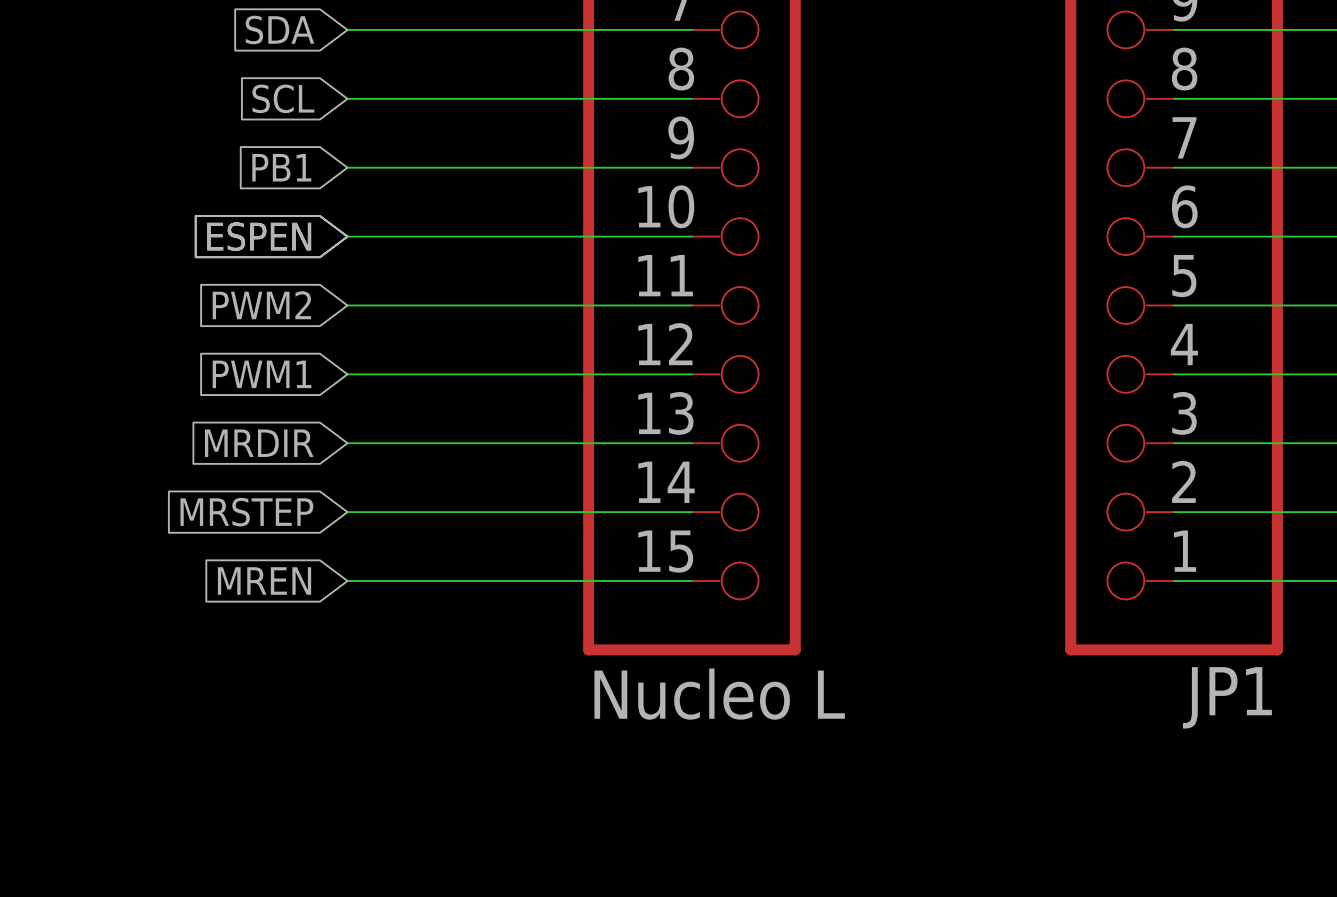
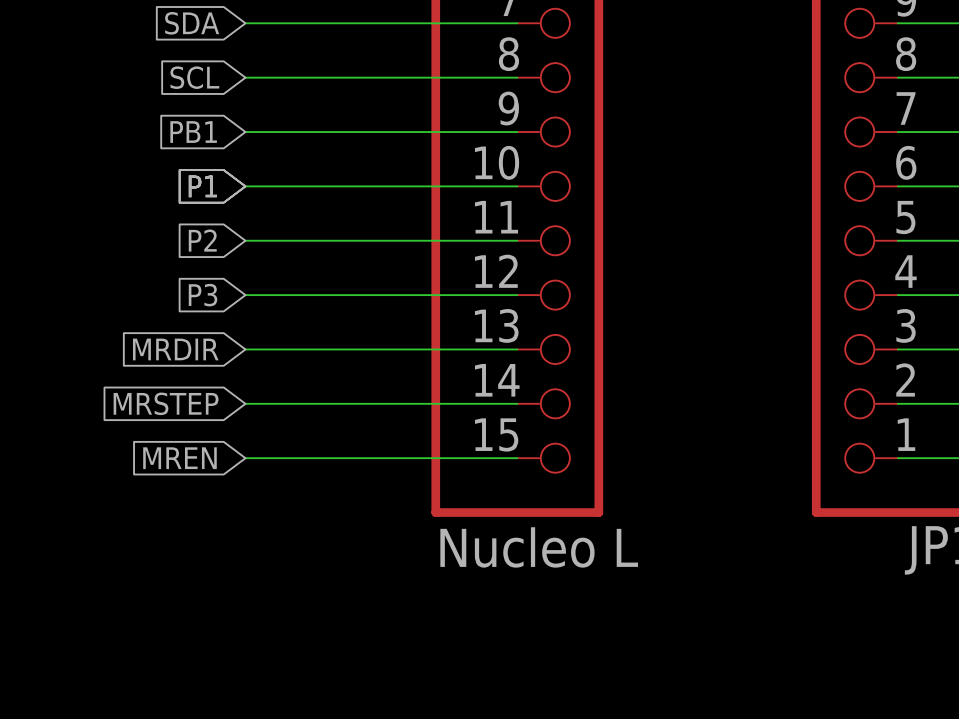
global label: ESPEN (259, 236) -> P1 (202, 186)
global label: PWM2 (261, 305) -> P2 (202, 240)
global label: PWM1 (262, 374) -> P3 (203, 295)

